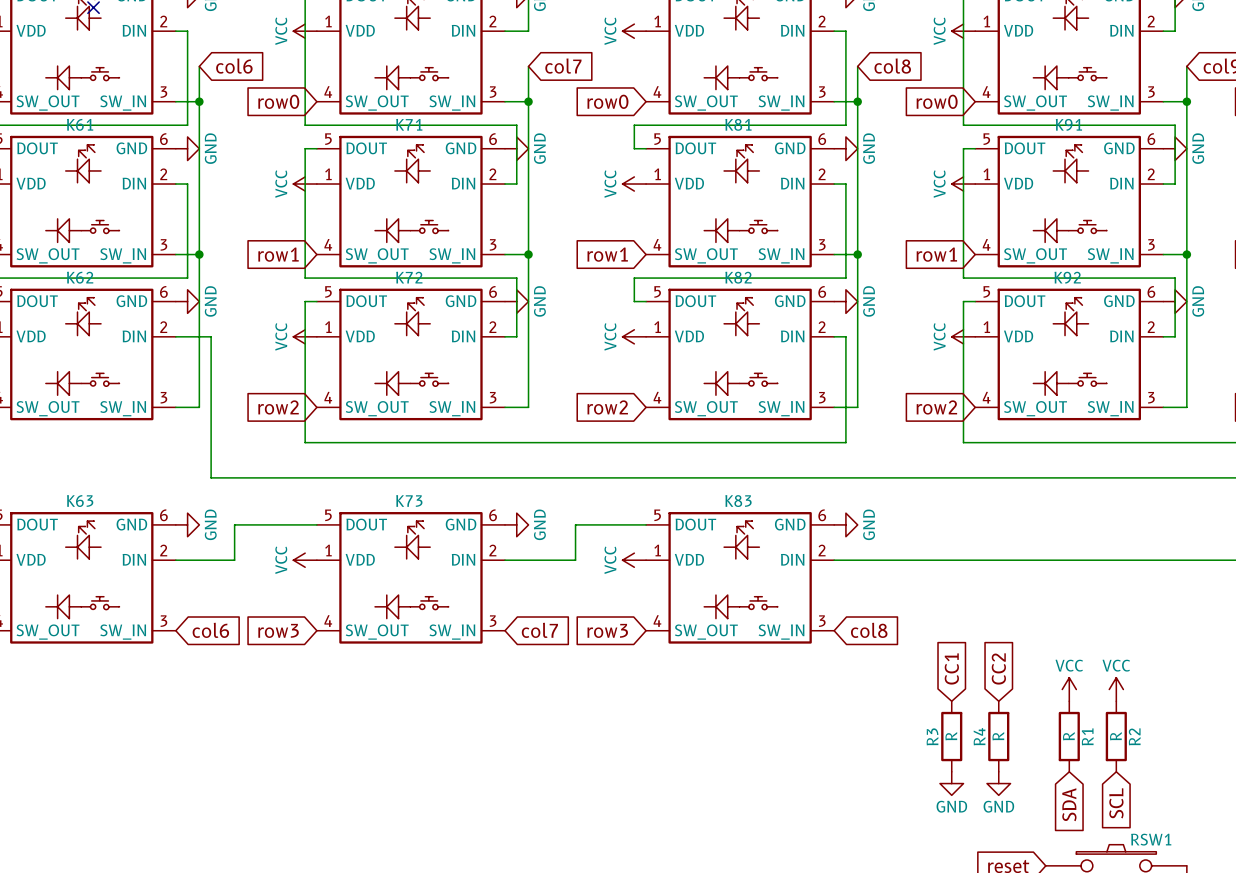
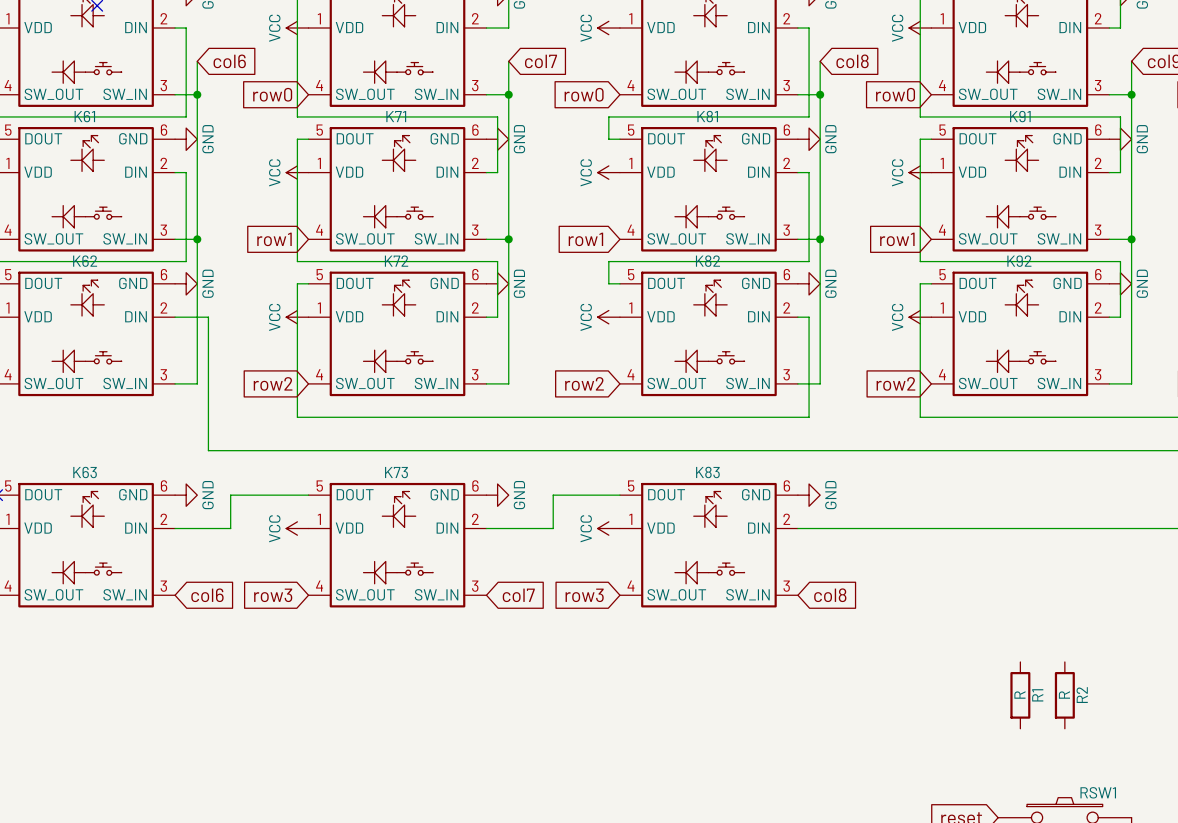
global label: CC1 (951, 668) -> none
global label: CC2 (998, 668) -> none
power symbol: VCC (1069, 689) -> none
power symbol: VCC (1116, 689) -> none
R3: R (951, 736) -> none
R4: R (998, 736) -> none
power symbol: GND (951, 783) -> none
power symbol: GND (998, 783) -> none
global label: SCL (1116, 803) -> none
global label: SDA (1069, 804) -> none

